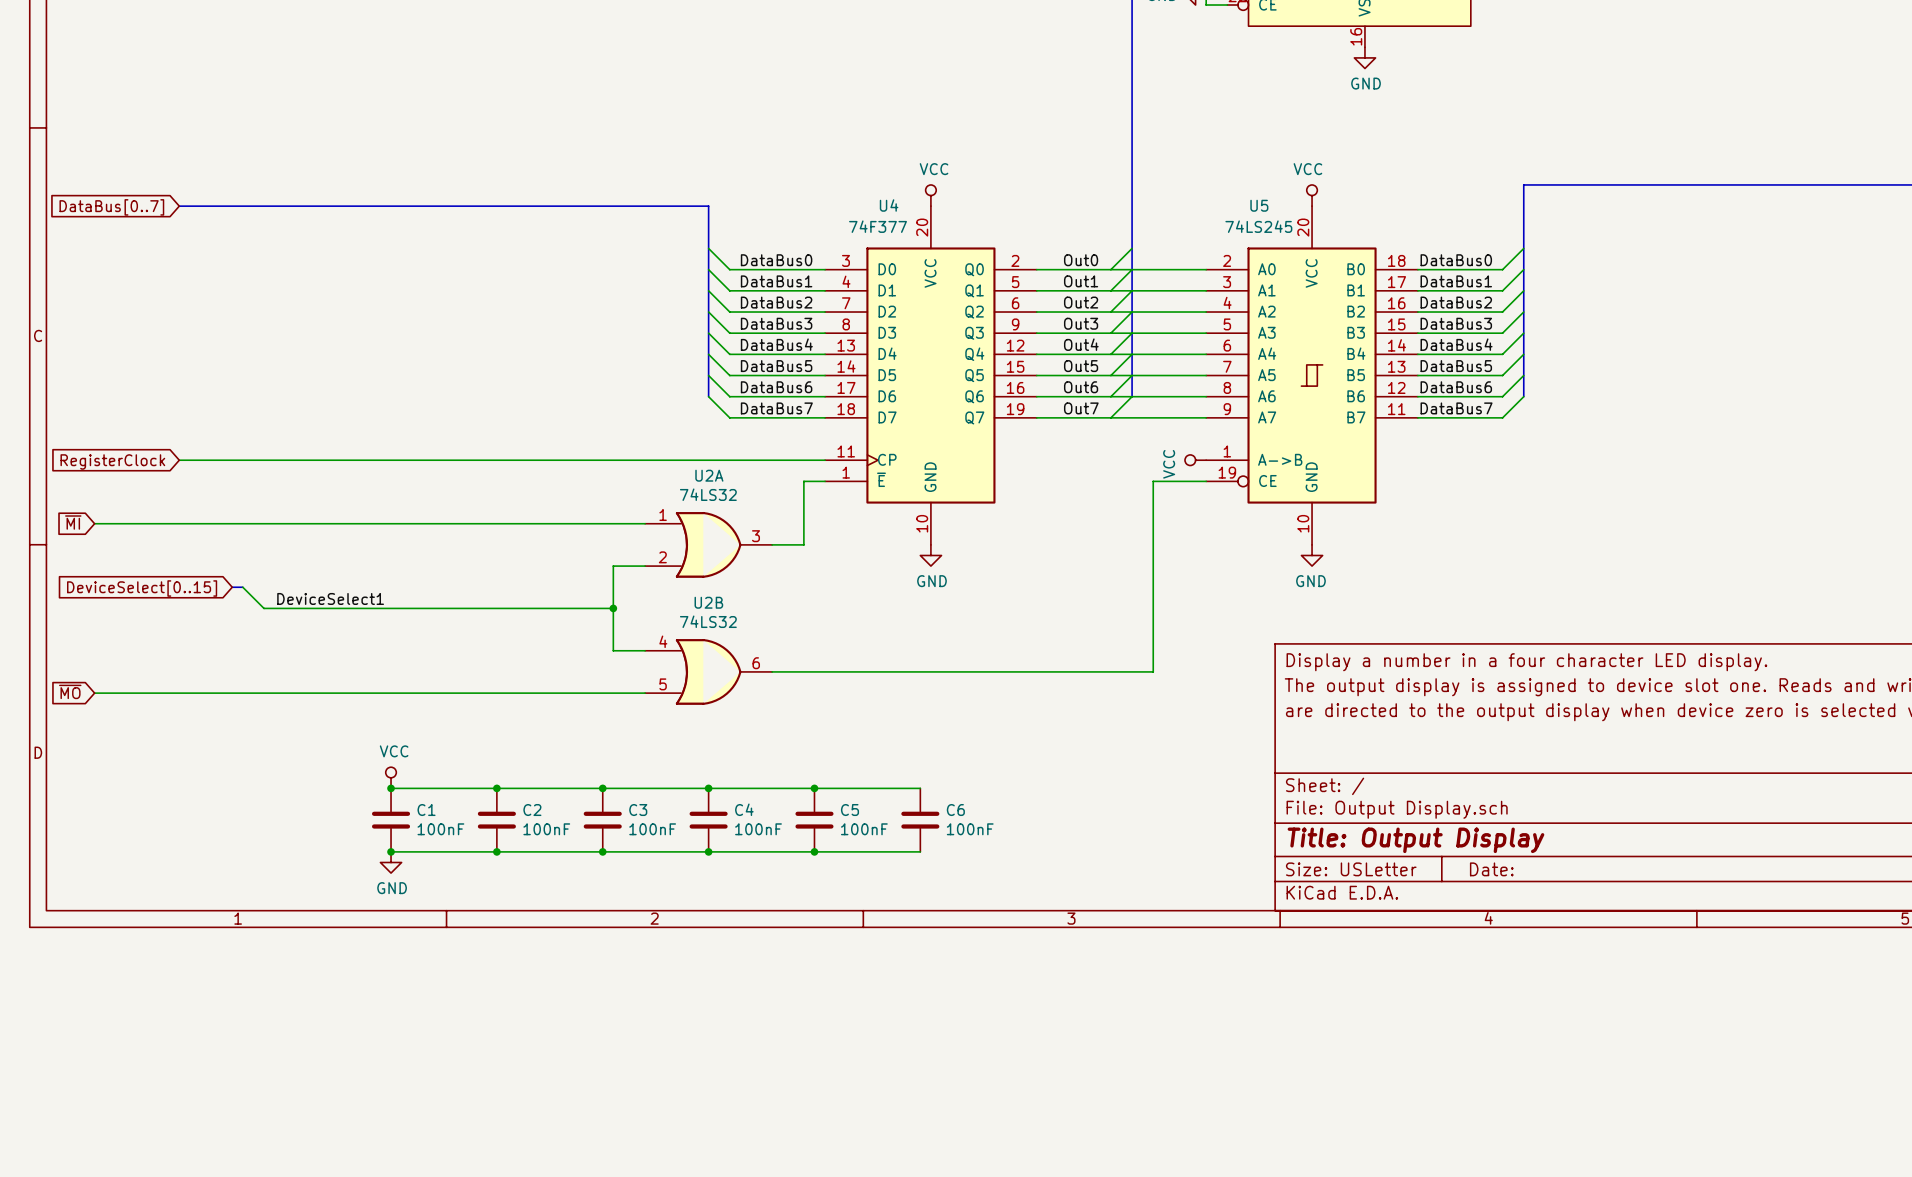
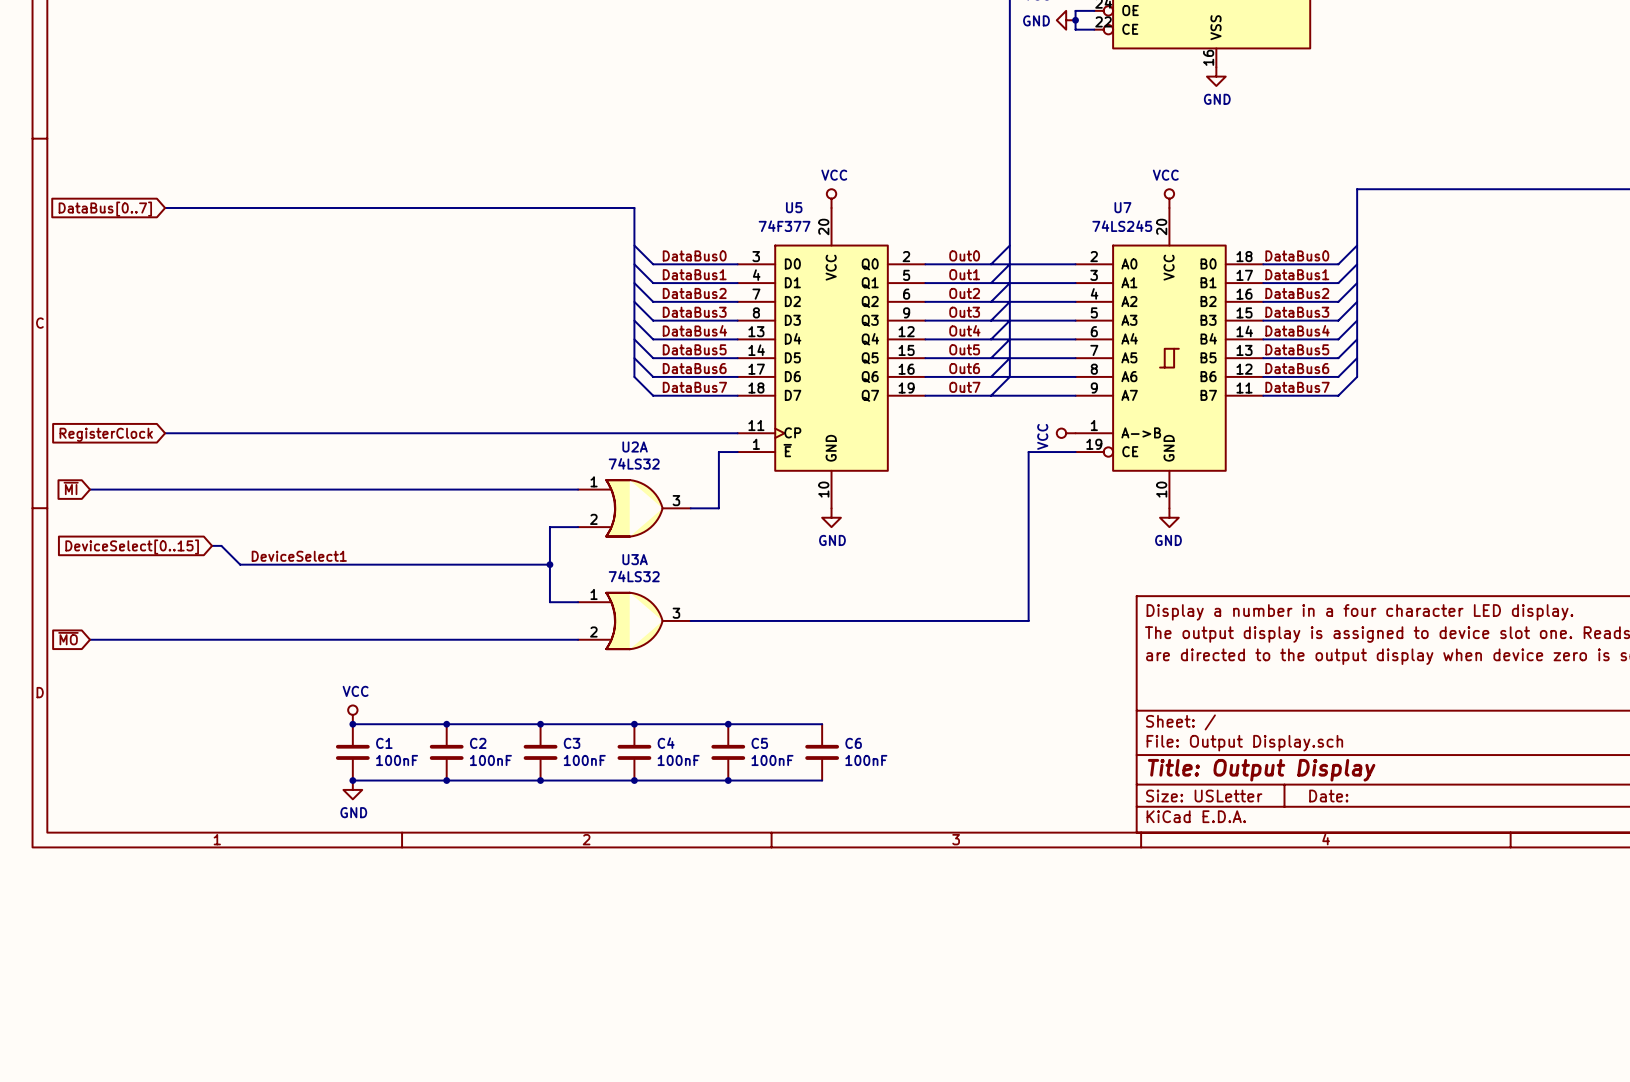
U4 name: U4 (889, 205) -> U5 (794, 207)
U5 name: U5 (1259, 205) -> U7 (1122, 207)
U2B name: U2B (708, 602) -> U3A (635, 559)
U2B pin number: 4 (663, 641) -> 1 (594, 594)
U2B pin number: 6 (756, 663) -> 3 (676, 613)
U2B pin number: 5 (663, 684) -> 2 (593, 632)

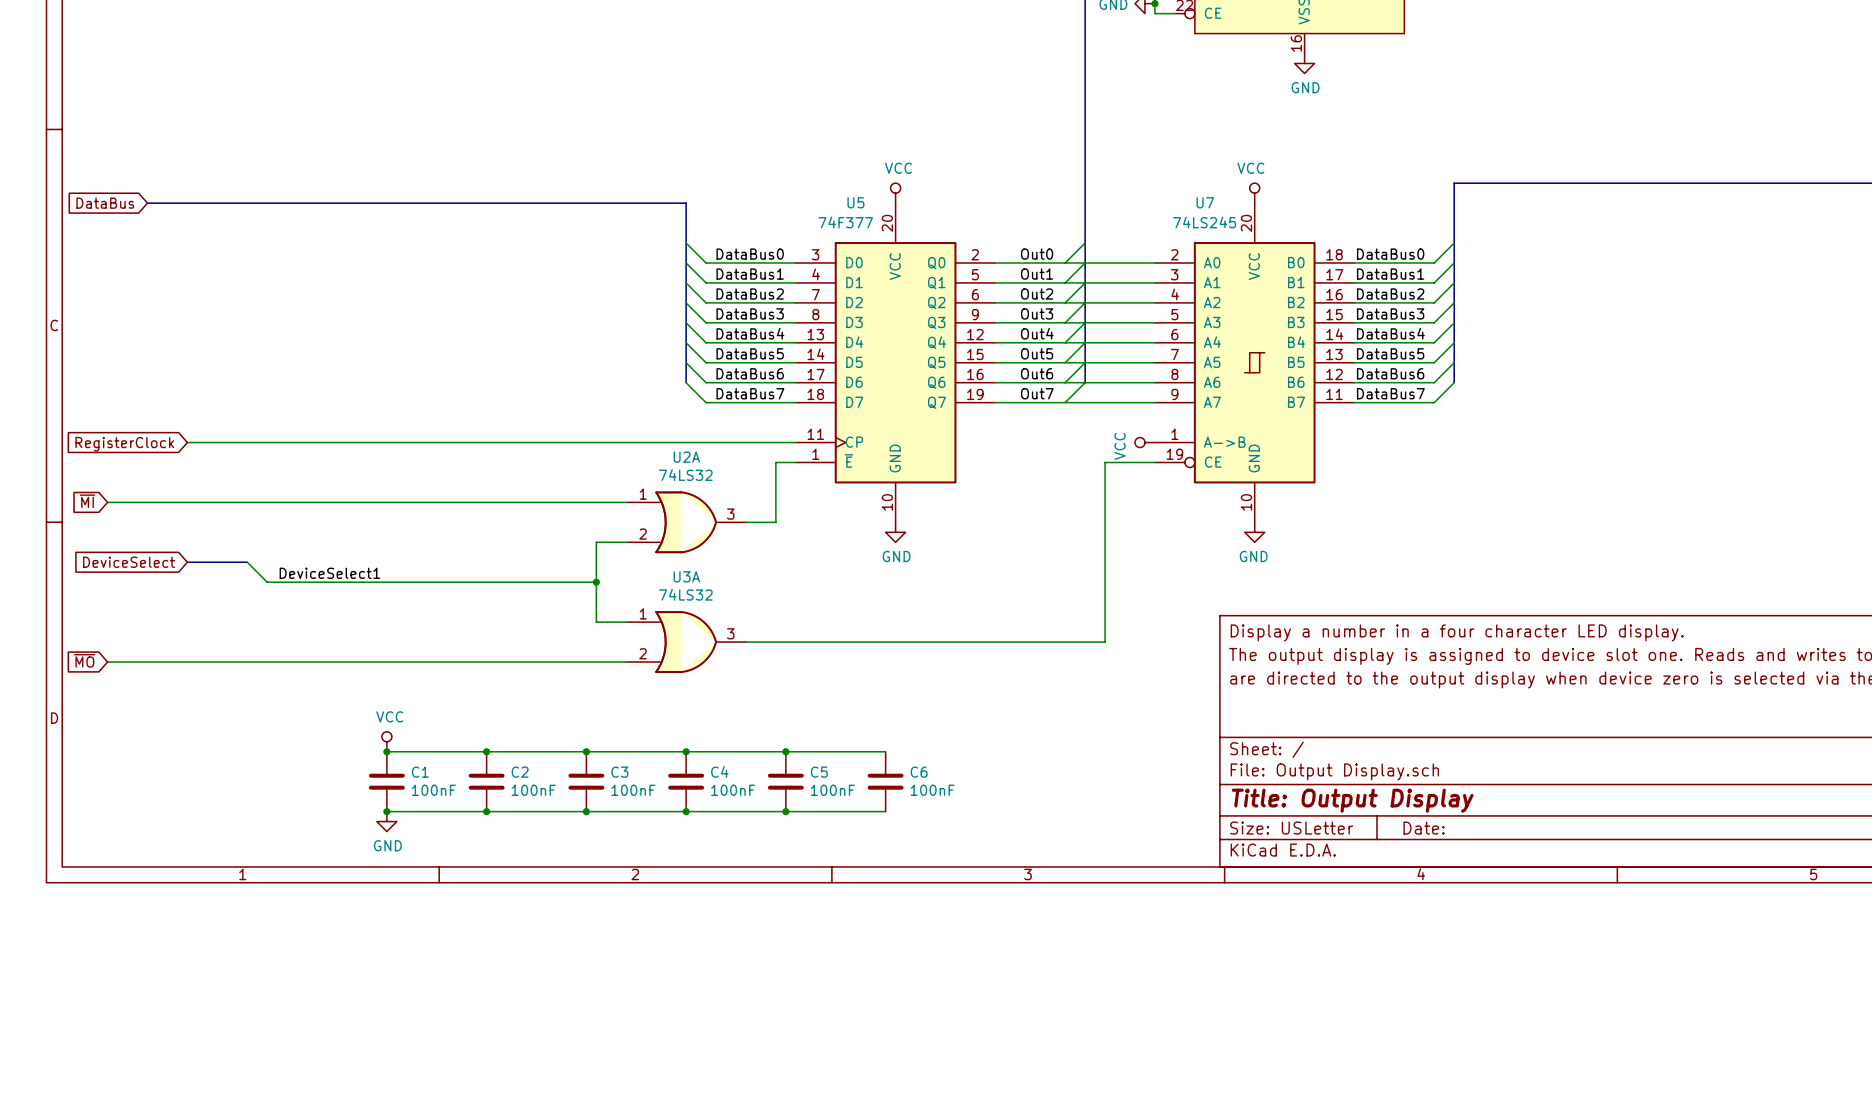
bus: none -> (147, 203) (187, 203)
global label: DataBus[0..7] (105, 209) -> DataBus (105, 203)
bus: none -> (187, 562) (237, 562)
global label: DeviceSelect[0..15] (132, 547) -> DeviceSelect (129, 562)

